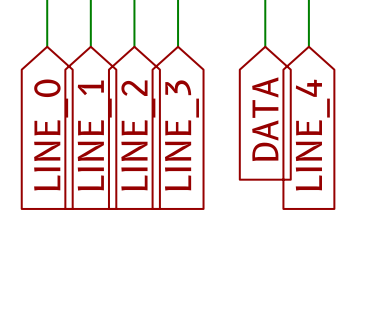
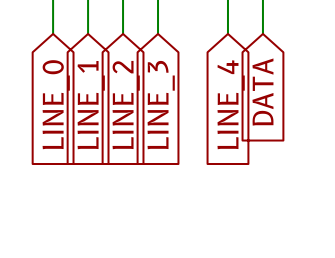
global label: DATA (265, 119) -> LINE_4 (231, 104)
global label: LINE_4 (312, 135) -> DATA (262, 92)

